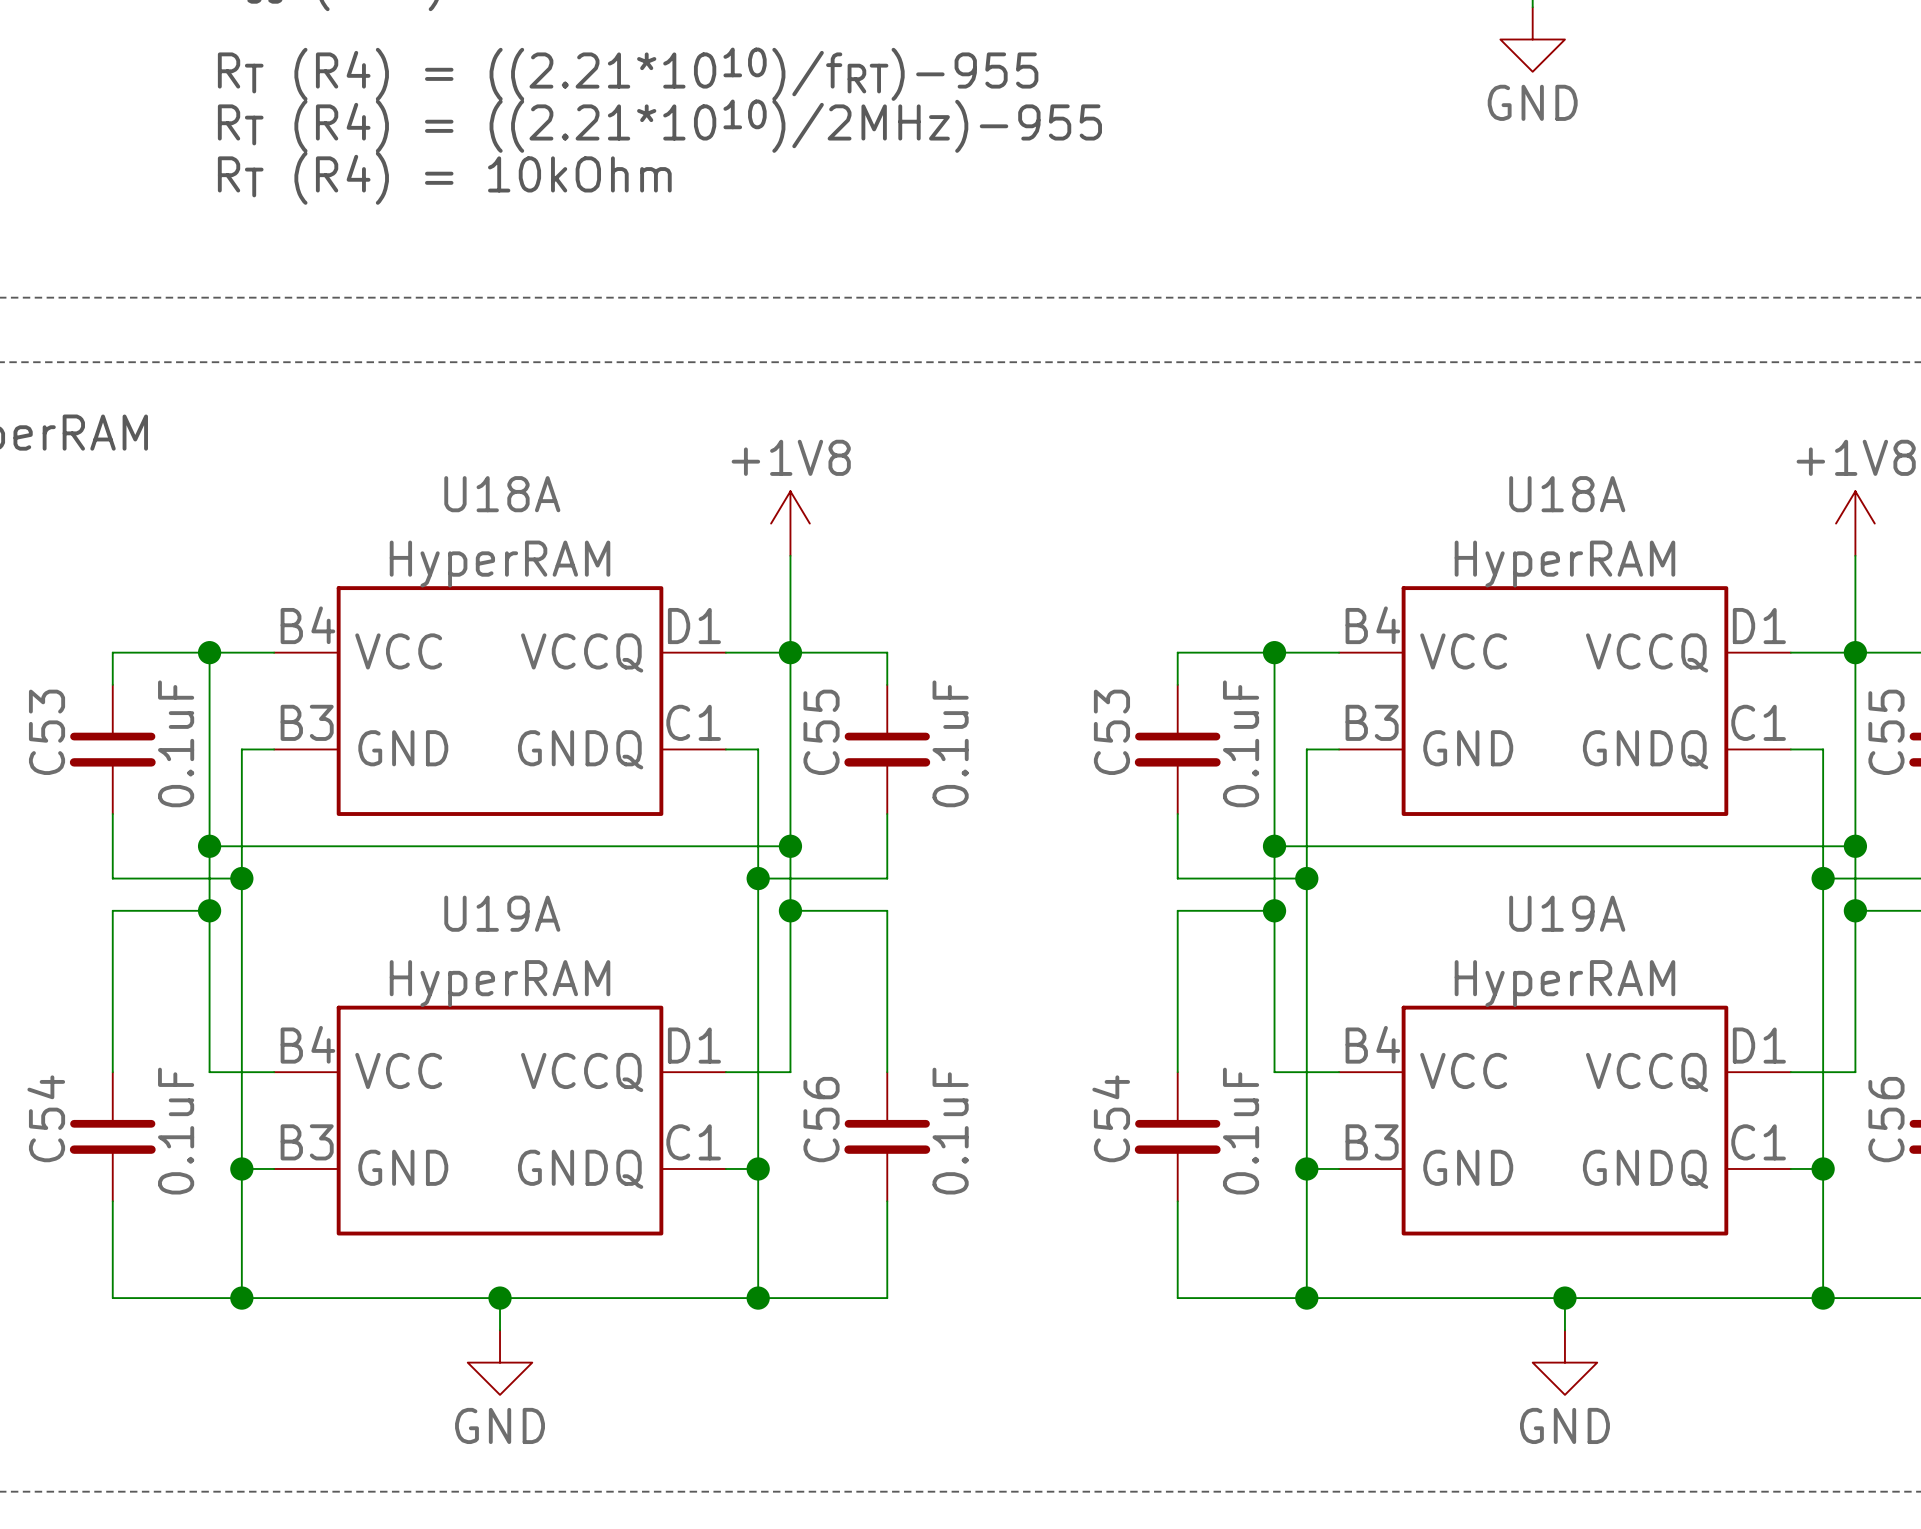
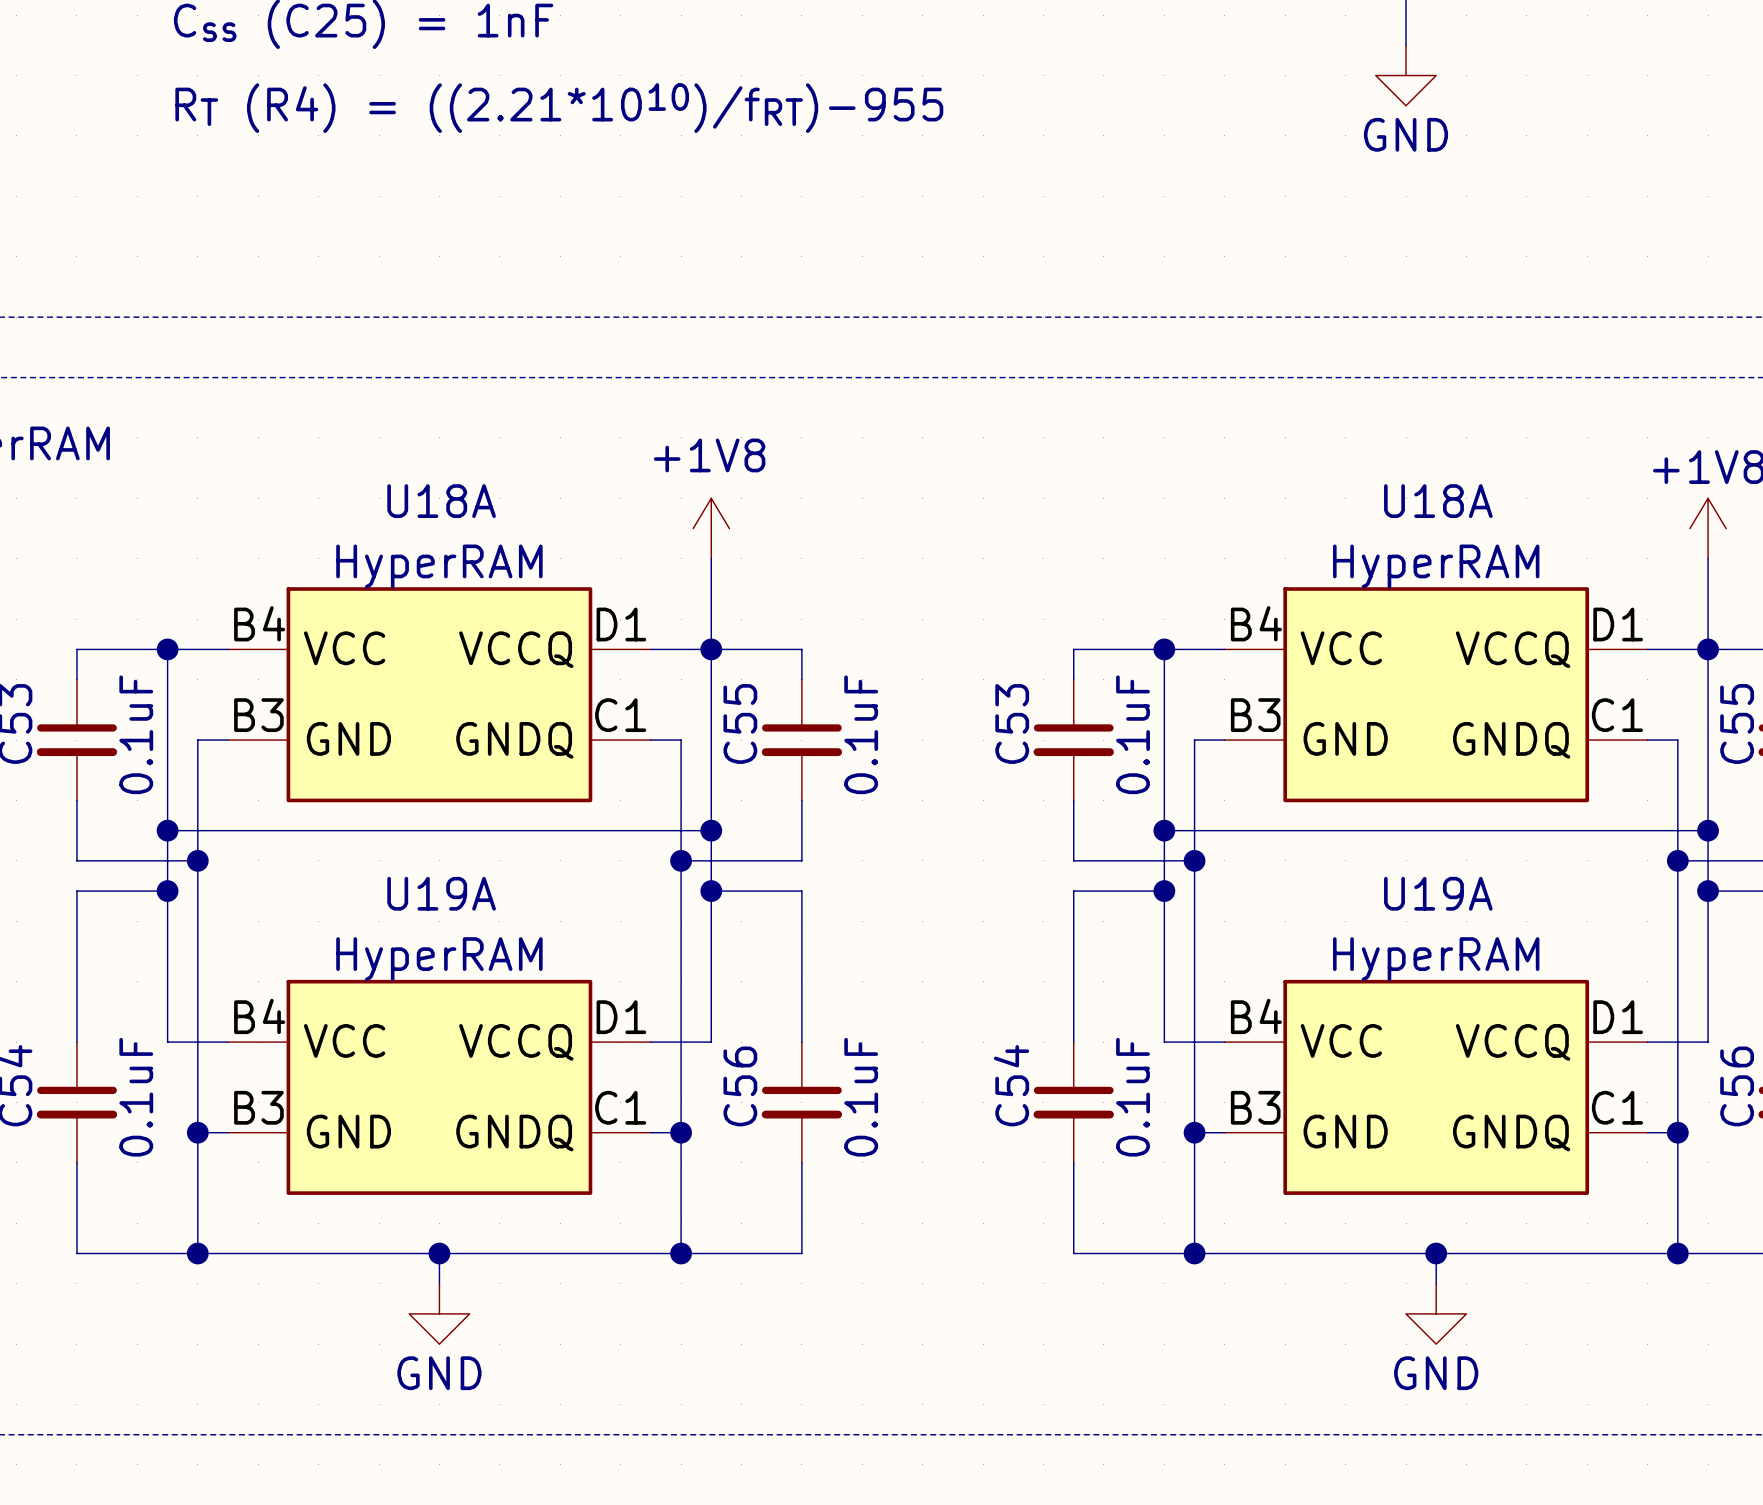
text: RT (R4) = ((2.21*1010)/2MHz)-955 (659, 126) -> none
text: RT (R4) = 10kOhm (444, 178) -> none
power symbol text position: +1V8 (791, 457) -> +1V8 (709, 455)

